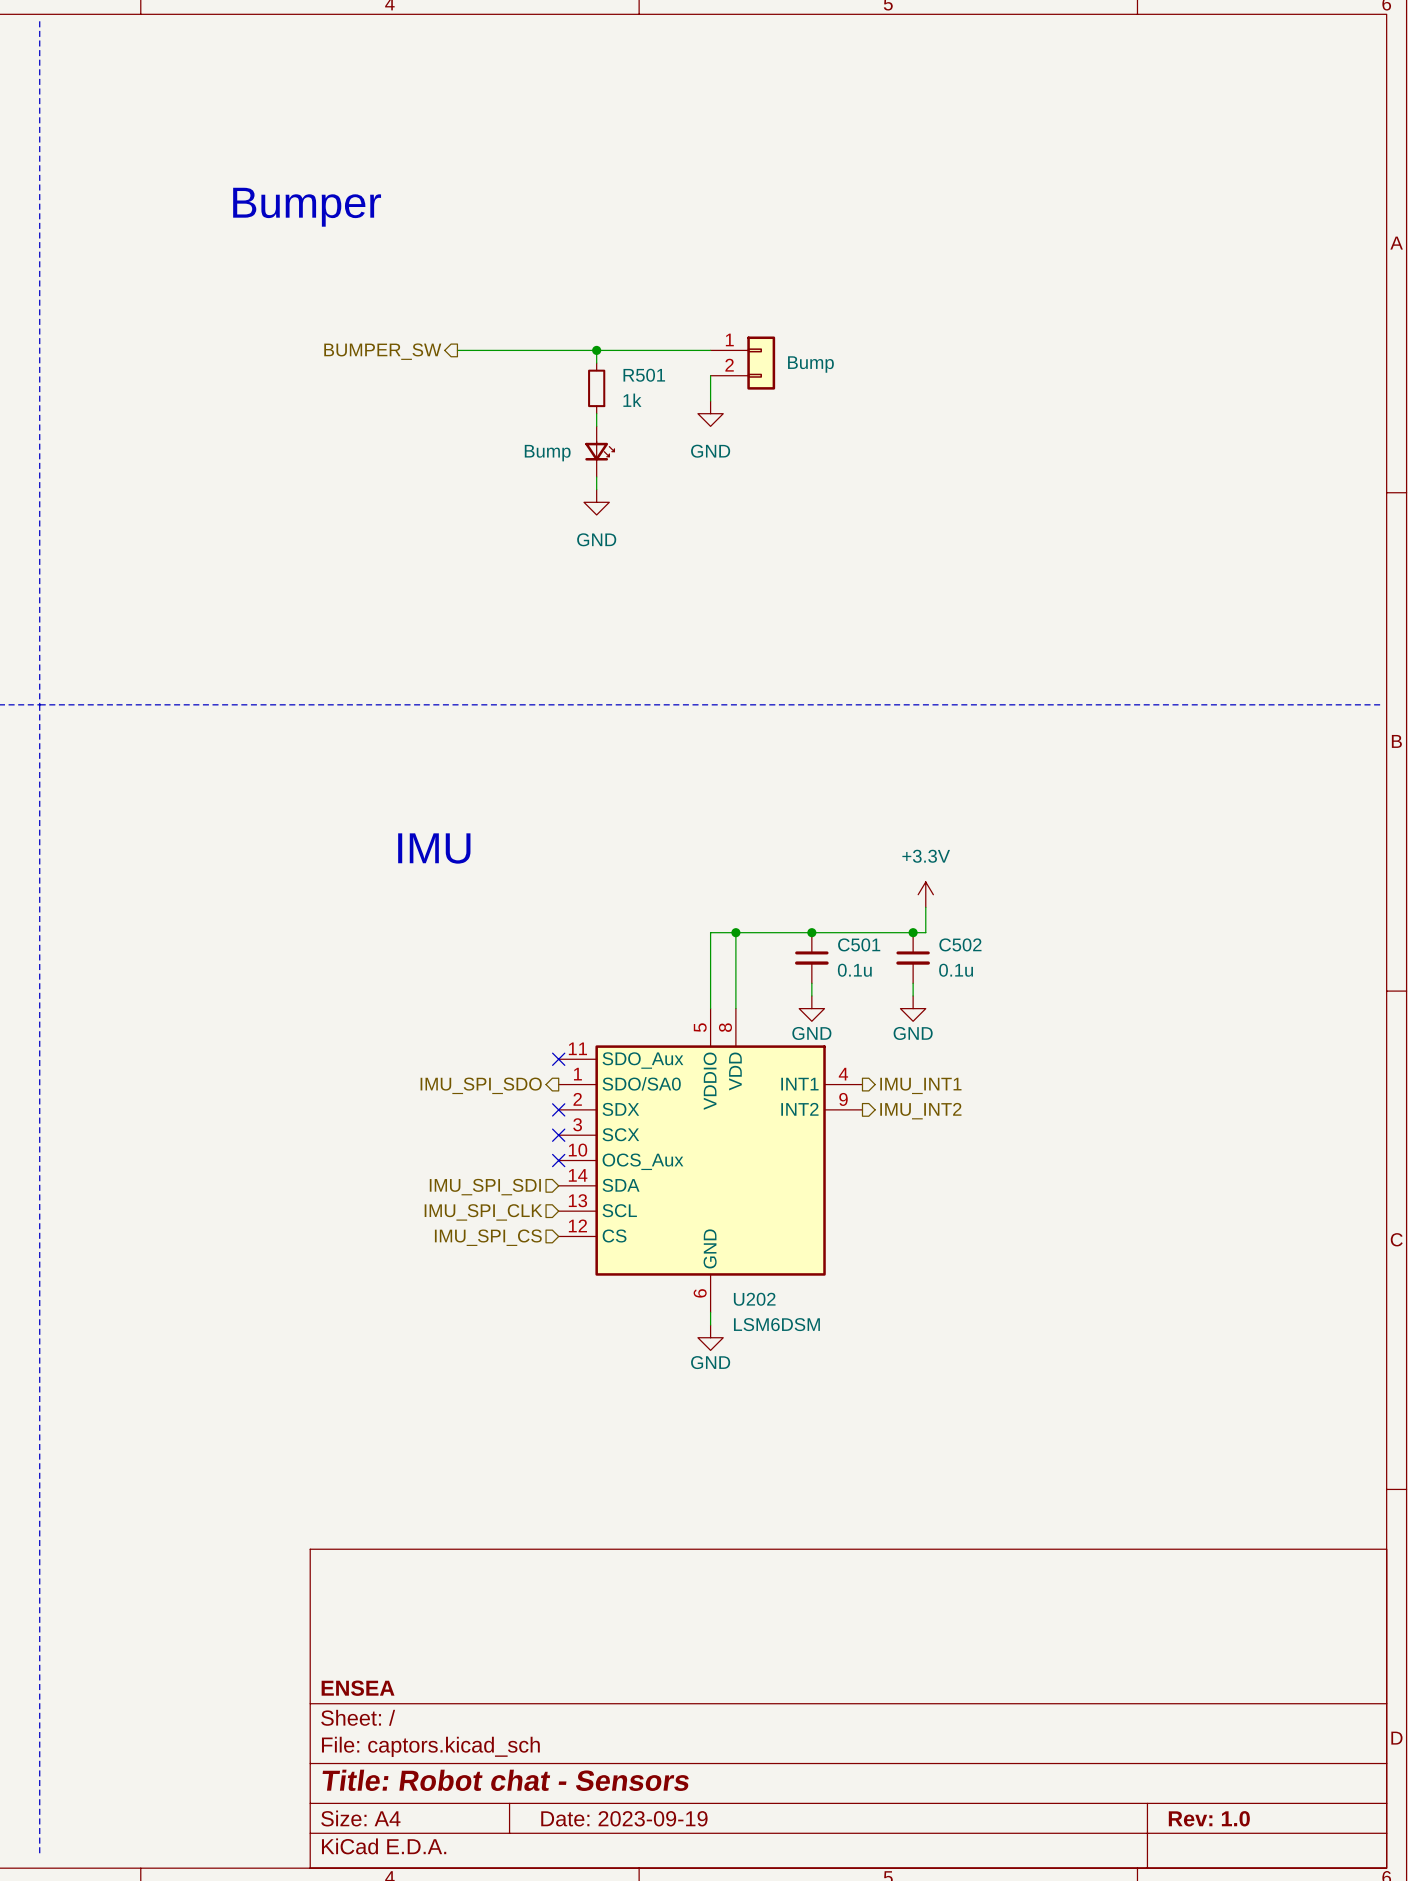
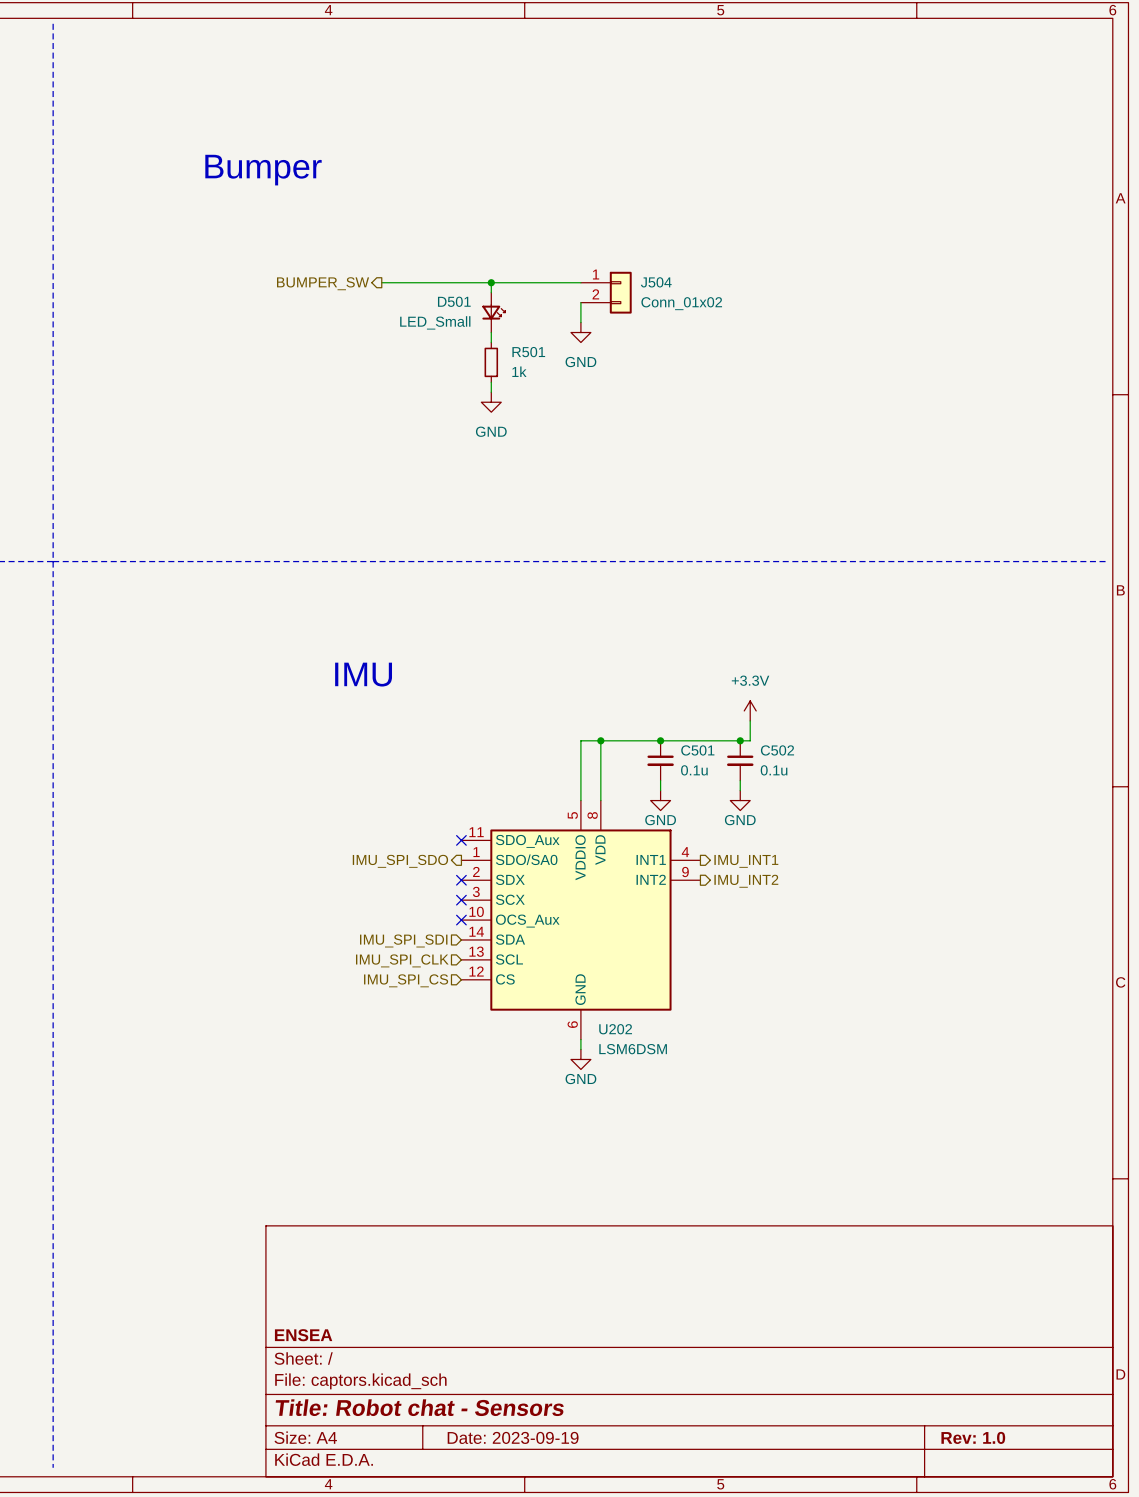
J504 name: none -> J504 (656, 282)
J504 value: Bump (810, 364) -> Conn_01x02 (681, 303)
R501 position: (596, 388) -> (491, 362)
D501: none -> LED_Small (493, 312)
part: Bump (599, 451) -> none

